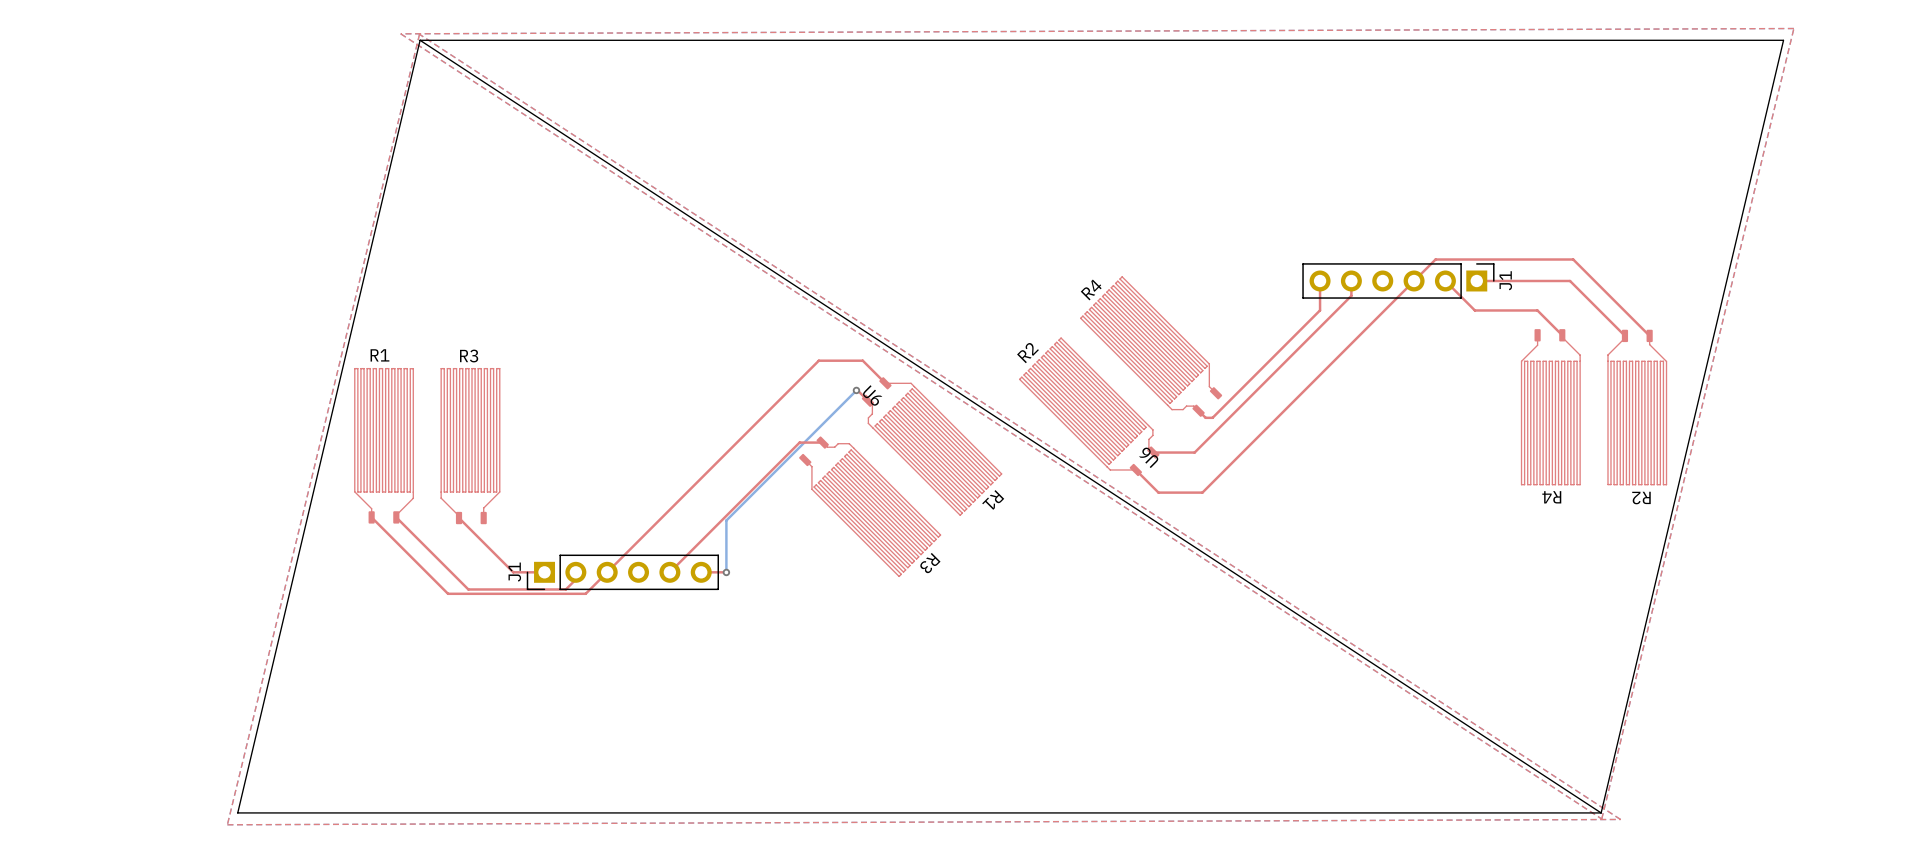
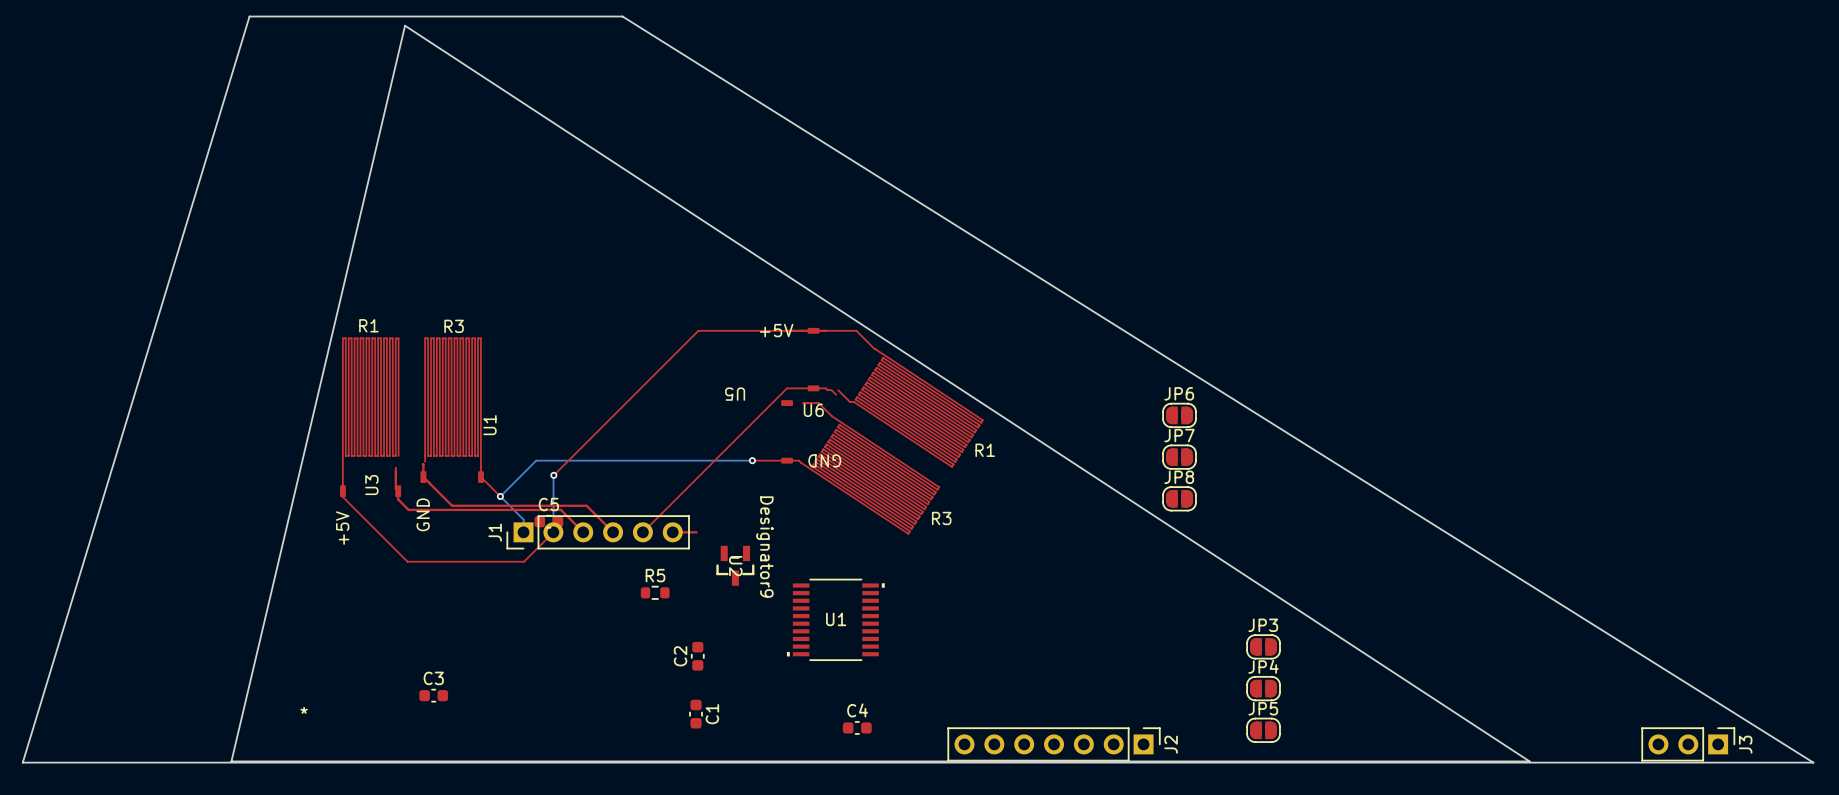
top zone outline: (1793, 28) (1601, 818) (400, 33) (1793, 28) -> none
board edge: none -> (249, 16) (622, 16) (1813, 762) (22, 762) (249, 16)
top zone outline: (419, 34) (227, 824) (1620, 819) (419, 34) -> none
line: (420, 40) (1601, 812) -> none
board edge: (420, 40) (1783, 40) -> (405, 25) (1529, 761)
board edge: (1783, 40) (1601, 812) -> none
top track: (1320, 280) (1320, 310) (1212, 417) (1205, 417) (1193, 406) (1186, 406) (1183, 409) (1172, 409) -> none
top track: (1351, 280) (1351, 295) (1194, 452) (1153, 452) (1148, 448) (1148, 439) (1152, 435) (1152, 429) -> none
J1: (1398, 280) -> none
top track: (1445, 280) (1474, 310) (1537, 310) (1580, 355) -> none
top track: (1476, 280) (1570, 280) (1624, 335) (1607, 355) -> none
text: R4 (1091, 289) -> none
top track: (1537, 335) (1537, 345) (1521, 361) (1521, 484) (1524, 484) (1524, 361) (1527, 361) (1527, 484) (1530, 484) (1530, 361) (1533, 361) (1533, 484) (1536, 484) (1536, 361) (1540, 361) (1540, 484) (1543, 484) (1543, 361) (1546, 361) (1546, 484) (1549, 484) (1549, 361) (1552, 361) (1552, 484) (1555, 484) (1555, 361) (1558, 361) (1558, 484) (1561, 484) (1561, 361) (1564, 361) (1564, 484) (1567, 484) (1567, 361) (1570, 361) (1570, 484) (1573, 484) (1573, 361) (1577, 361) (1577, 484) (1580, 484) (1580, 361) -> none
part: (1549, 335) -> none
part: (1637, 335) -> none
text: R2 (1027, 353) -> none
part: (1580, 358) -> none
part: (1607, 358) -> none
top track: (818, 360) (585, 593) (448, 593) (371, 517) (371, 508) (354, 491) -> (784, 330) (698, 330) (553, 475)
top track: (862, 360) (885, 383) (911, 383) (1001, 473) (999, 476) (912, 388) (910, 391) (997, 478) (995, 480) (907, 393) (905, 395) (992, 482) (990, 484) (903, 397) (901, 399) (988, 487) (986, 489) (899, 401) (896, 404) (984, 491) (982, 493) (894, 406) (892, 408) (979, 495) (977, 497) (890, 410) (888, 412) (975, 500) (973, 502) (886, 415) (883, 417) (971, 504) (968, 506) (881, 419) (879, 421) (966, 508) (964, 511) (877, 423) (875, 425) (962, 513) (960, 515) (872, 427) -> (826, 330) (856, 330) (874, 349) (982, 420) (981, 422) (883, 357) (881, 360) (979, 425) (977, 427) (879, 362) (878, 365) (976, 430) (974, 432) (876, 367) (875, 370) (973, 434) (971, 437) (873, 372) (871, 375) (969, 439) (968, 442) (870, 377) (868, 379) (966, 444) (964, 447) (867, 382) (865, 384) (963, 449) (961, 452) (863, 387) (862, 389) (960, 454) (958, 457) (860, 392) (858, 394) (956, 459) (955, 461) (857, 397) (855, 399) (953, 464) (952, 466) (854, 401) (850, 401) (838, 390)
top track: (1607, 361) (1607, 484) (1610, 484) (1610, 361) (1614, 361) (1614, 484) (1617, 484) (1617, 361) (1620, 361) (1620, 484) (1623, 484) (1623, 361) (1626, 361) (1626, 484) (1629, 484) (1629, 361) (1632, 361) (1632, 484) (1635, 484) (1635, 361) (1638, 361) (1638, 484) (1641, 484) (1641, 361) (1644, 361) (1644, 484) (1648, 484) (1648, 361) (1651, 361) (1651, 484) (1654, 484) (1654, 361) (1657, 361) (1657, 484) (1660, 484) (1660, 361) (1663, 361) (1663, 484) (1666, 484) (1666, 361) (1649, 344) (1649, 335) (1573, 259) (1435, 259) (1202, 492) (1158, 492) (1135, 469) (1110, 469) (1019, 379) (1021, 377) (1109, 464) (1111, 462) (1023, 375) (1026, 372) (1113, 460) (1115, 457) (1028, 370) (1030, 368) (1117, 455) (1119, 453) (1032, 366) (1034, 364) (1122, 451) (1124, 449) (1037, 361) (1039, 359) (1126, 446) (1128, 444) (1041, 357) (1043, 355) (1130, 442) (1133, 440) (1045, 353) (1047, 351) (1135, 438) (1137, 436) (1050, 348) (1052, 346) (1139, 433) (1141, 431) (1054, 344) (1056, 342) (1143, 429) (1146, 427) (1058, 340) (1061, 338) (1148, 425) -> none
U6: none -> (813, 359)
top track: (856, 390) (872, 405) (872, 413) (868, 417) (868, 423) -> none
bottom track: (856, 390) (726, 520) (726, 572) -> none
via: (856, 390) -> none
U6: (876, 392) -> none
top track: (1216, 393) (1209, 386) (1209, 364) (1122, 276) (1119, 279) (1207, 366) (1205, 368) (1117, 281) (1115, 283) (1202, 370) (1200, 372) (1113, 285) (1111, 287) (1198, 375) (1196, 377) (1109, 289) (1106, 292) (1194, 379) (1191, 381) (1104, 294) (1102, 296) (1189, 383) (1187, 385) (1100, 298) (1098, 300) (1185, 388) (1183, 390) (1095, 303) (1093, 305) (1181, 392) (1178, 394) (1091, 307) (1089, 309) (1176, 396) (1174, 399) (1087, 311) (1085, 313) (1172, 401) (1170, 403) (1082, 316) (1080, 318) (1167, 405) -> none
part: (1207, 402) -> none
part: (1169, 407) -> none
part: (1150, 427) -> none
part: none -> (806, 403)
top track: none -> (810, 403) (818, 403) (831, 416) (939, 487) (937, 489) (839, 424) (837, 427) (935, 492) (934, 494) (836, 429) (834, 432) (932, 497) (931, 499) (833, 434) (831, 437) (929, 501) (927, 504) (829, 439) (828, 441) (926, 506) (924, 509) (826, 444) (824, 446) (922, 511) (921, 514) (823, 449) (821, 451) (919, 516) (918, 519) (820, 454) (818, 456) (916, 521) (914, 523) (816, 459) (815, 461) (913, 526) (911, 528) (813, 464) (811, 466) (909, 531) (908, 533) (798, 460) (752, 460)
top track: (849, 443) (838, 443) (834, 447) (827, 447) (822, 442) (799, 442) (669, 572) -> (831, 390) (825, 388) (786, 388) (643, 532)
part: (851, 445) -> none
top track: (853, 448) (940, 535) (938, 537) (851, 449) (848, 452) (936, 539) (934, 541) (846, 454) (844, 456) (931, 543) (929, 545) (842, 458) (840, 460) (927, 548) (925, 550) (838, 463) (835, 465) (923, 552) (920, 554) (833, 467) (831, 469) (918, 556) (916, 559) (829, 471) (827, 473) (914, 561) (912, 563) (824, 476) (822, 478) (910, 565) (907, 567) (820, 480) (818, 482) (905, 569) (903, 572) (816, 484) (814, 487) (901, 574) (899, 576) (811, 489) (811, 466) (805, 460) -> none
JP6: none -> (1179, 415)
part: (813, 451) -> none
U6: (1144, 461) -> none
U5: none -> (787, 431)
top track: none -> (342, 455) (342, 488)
top track: (499, 491) (483, 508) (483, 518) -> (480, 455) (480, 467)
JP7: none -> (1179, 457)
part: (413, 495) -> none
bottom track: none -> (752, 460) (536, 460) (500, 496) (523, 519) (523, 532)
via: none -> (752, 460)
text: R4 (1551, 497) -> none
top track: (413, 498) (396, 517) (468, 589) (565, 589) (575, 579) (575, 572) -> (342, 485) (342, 497) (407, 561) (524, 561) (553, 532)
top track: (441, 498) (513, 572) (544, 572) -> none
text: R2 (1641, 498) -> none
text rotation: 0° (993, 499) -> 135° counterclockwise (985, 450)
text position: R1 (993, 499) -> R1 (985, 450)
top track: none -> (422, 464) (423, 477) (452, 505) (586, 505) (613, 532)
top track: none -> (481, 467) (481, 477) (500, 496)
part: none -> (395, 471)
top track: none -> (395, 474) (398, 499) (408, 509) (560, 509) (583, 532)
bottom track: none -> (553, 475) (553, 532)
via: none -> (553, 475)
U1: none -> (452, 477)
part: (383, 517) -> none
part: (471, 518) -> none
U3: none -> (370, 491)
via: none -> (500, 496)
JP8: none -> (1179, 498)
C5: none -> (548, 521)
text rotation: 0° (930, 563) -> 135° counterclockwise (941, 518)
text position: R3 (930, 563) -> R3 (941, 518)
via: (726, 572) -> none
U2: none -> (735, 565)
R5: none -> (655, 592)
U1: none -> (835, 619)
JP3: none -> (1263, 646)
C2: none -> (697, 656)
JP4: none -> (1263, 688)
C3: none -> (433, 695)
C1: none -> (696, 714)
C4: none -> (857, 727)
JP5: none -> (1263, 730)
J2: none -> (1054, 744)
J3: none -> (1688, 744)

